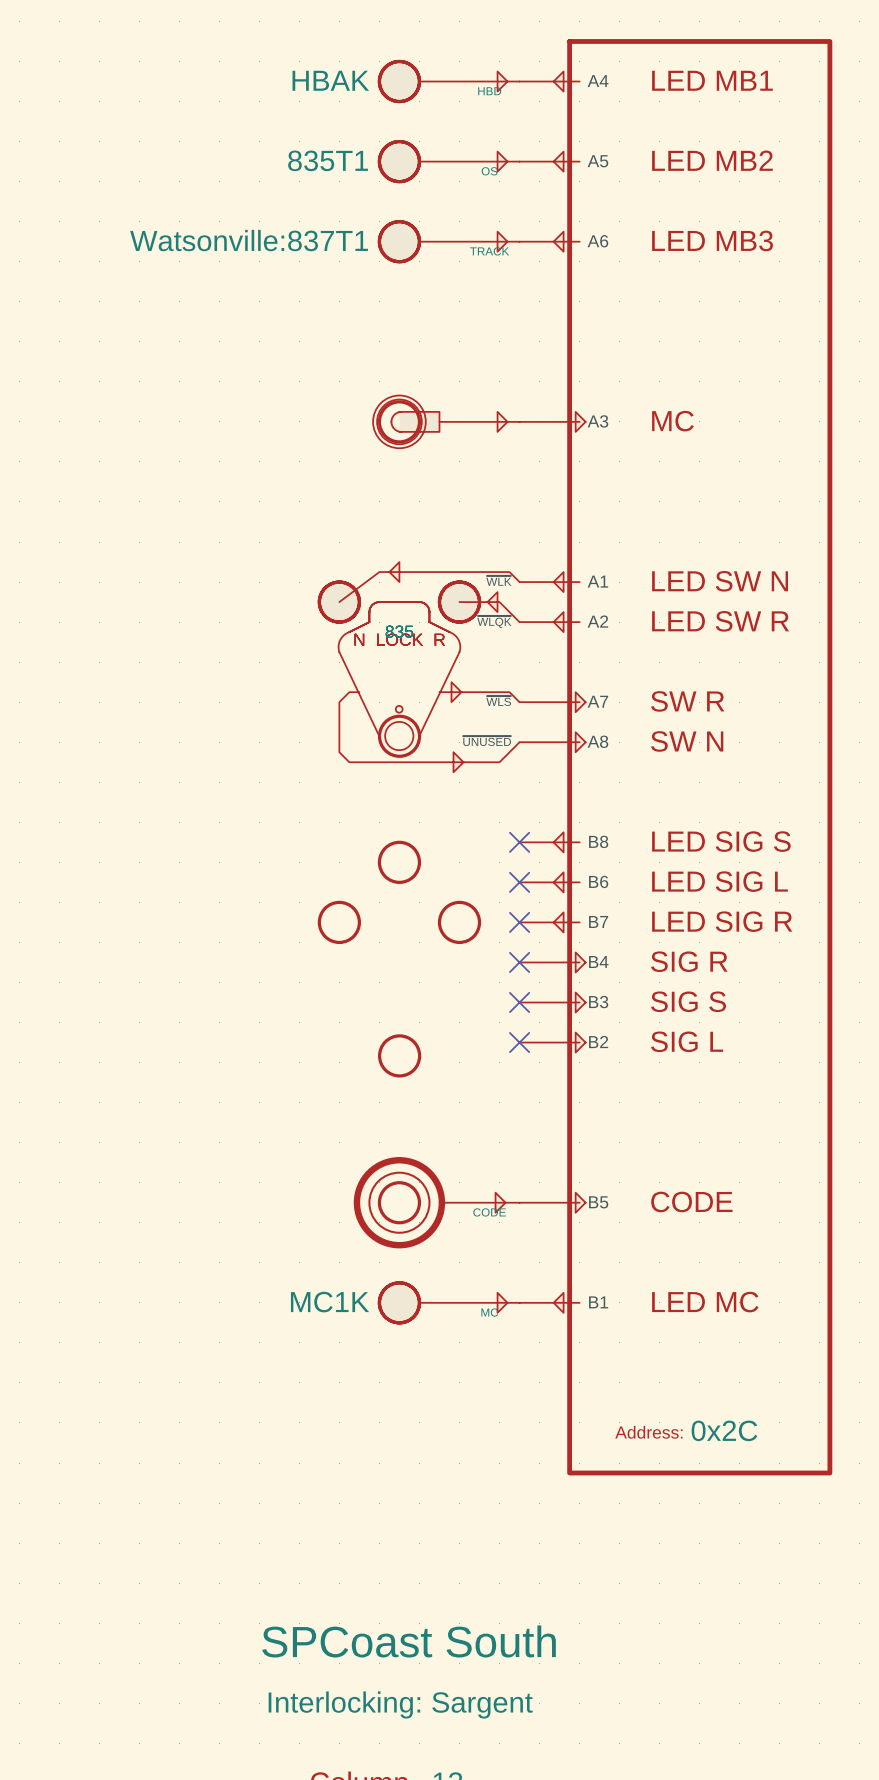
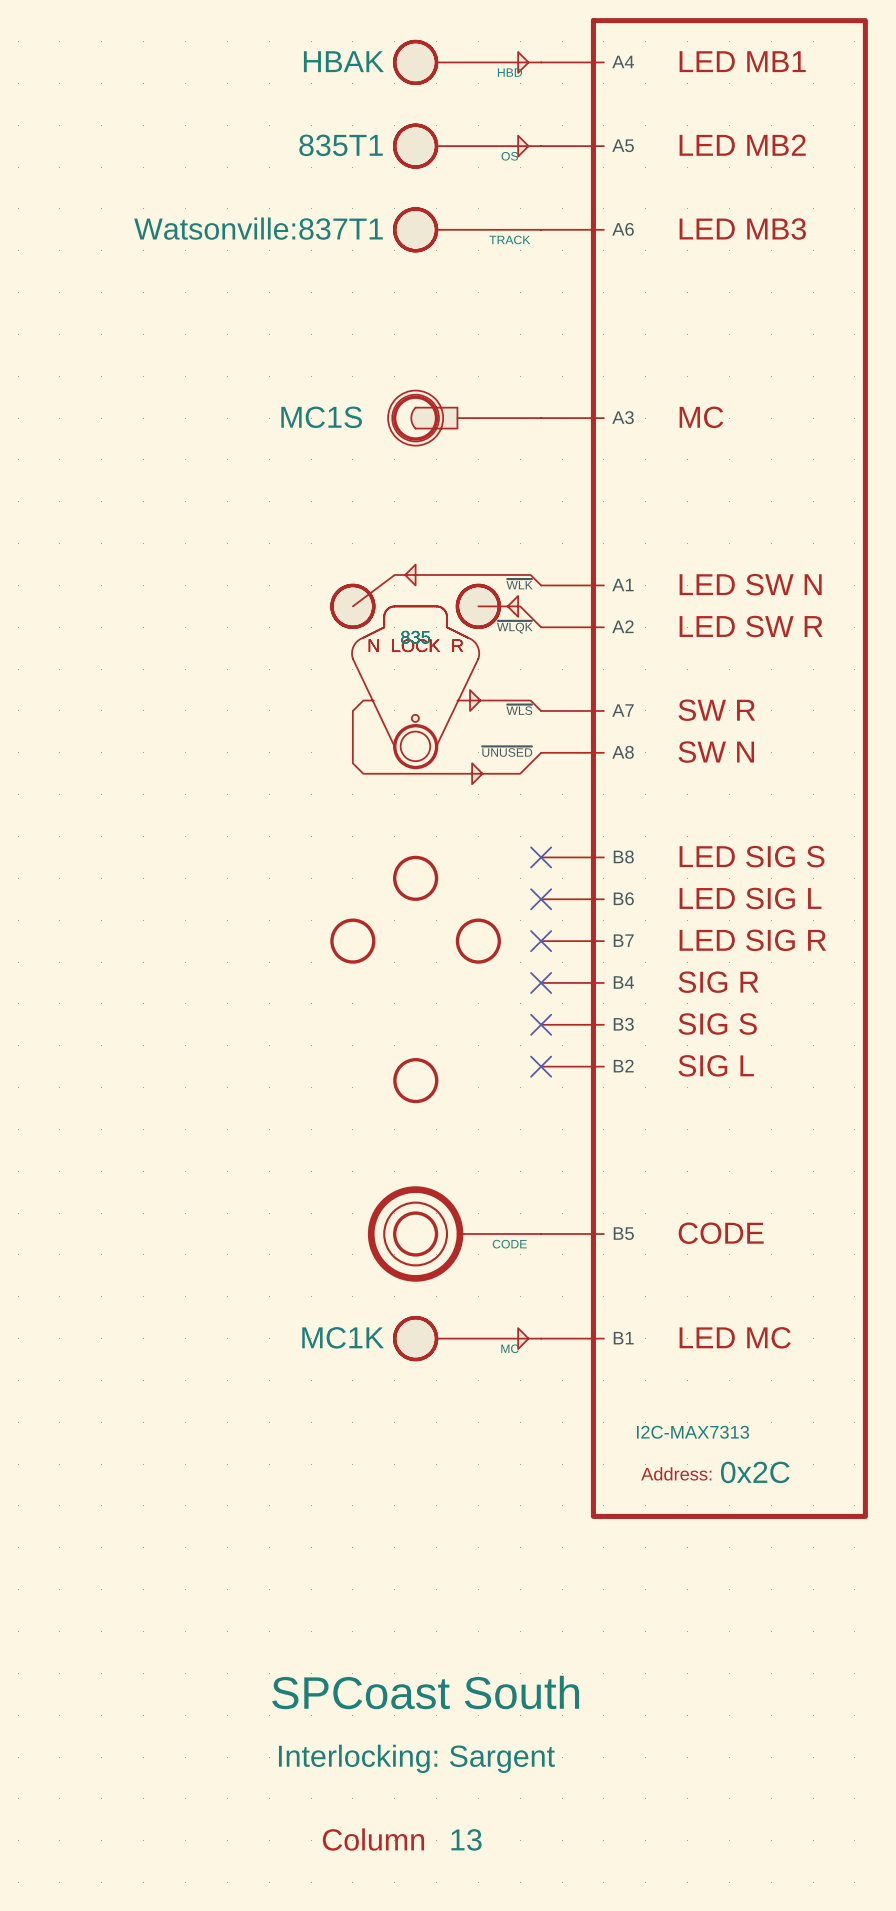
part symbol: [519, 39, 833, 1476] -> [541, 18, 868, 1519]
part symbol: [377, 220, 520, 264] -> [393, 207, 542, 253]
part symbol: [373, 395, 520, 449] -> [388, 390, 542, 446]
part text: none -> MC1S (321, 417)
part symbol: [353, 1157, 520, 1249] -> [367, 1186, 542, 1282]
part text: none -> I2C-MAX7313 (693, 1432)

